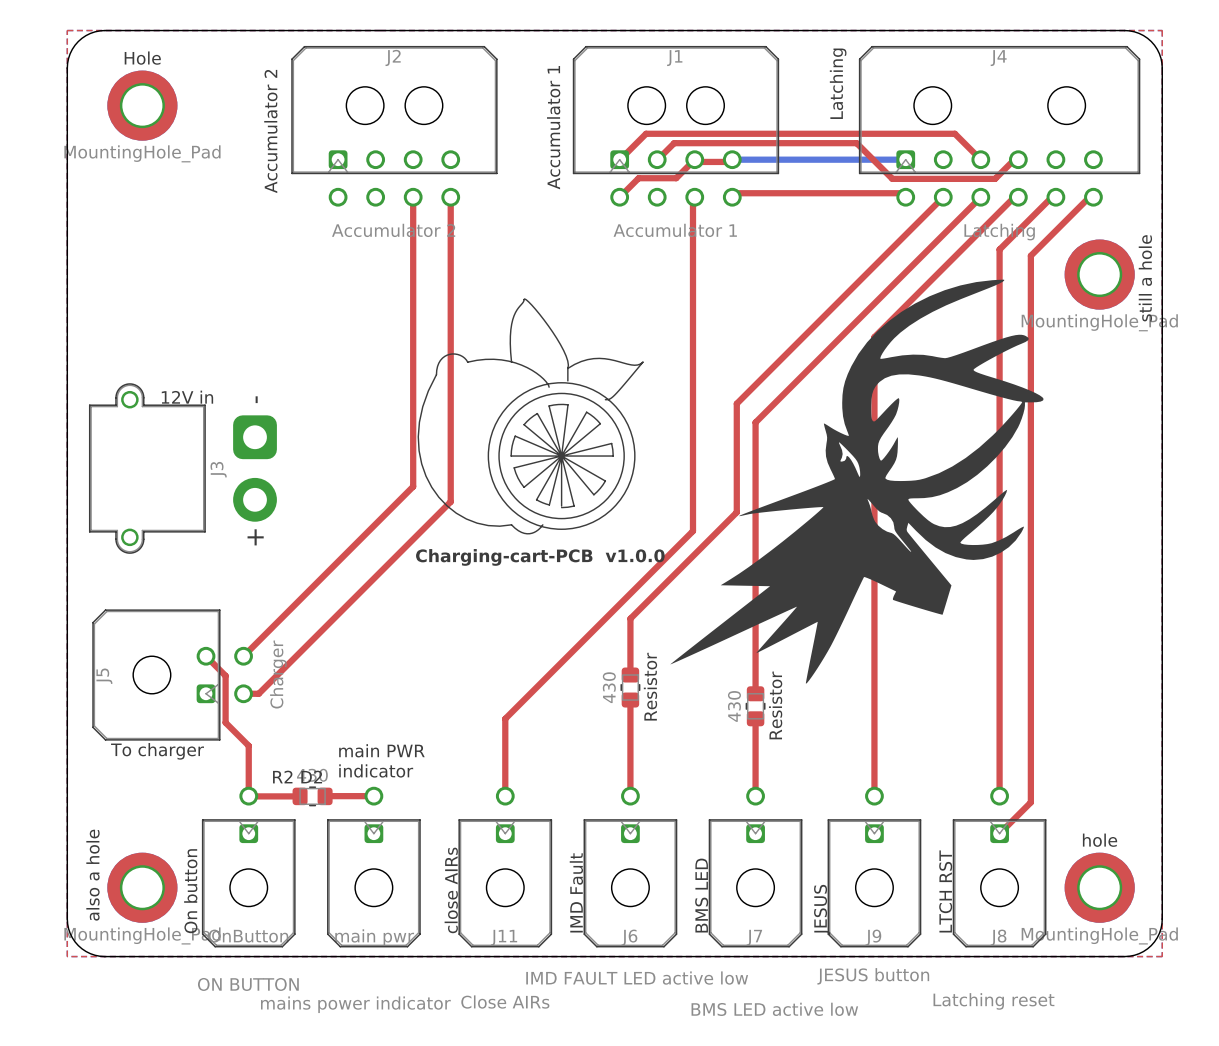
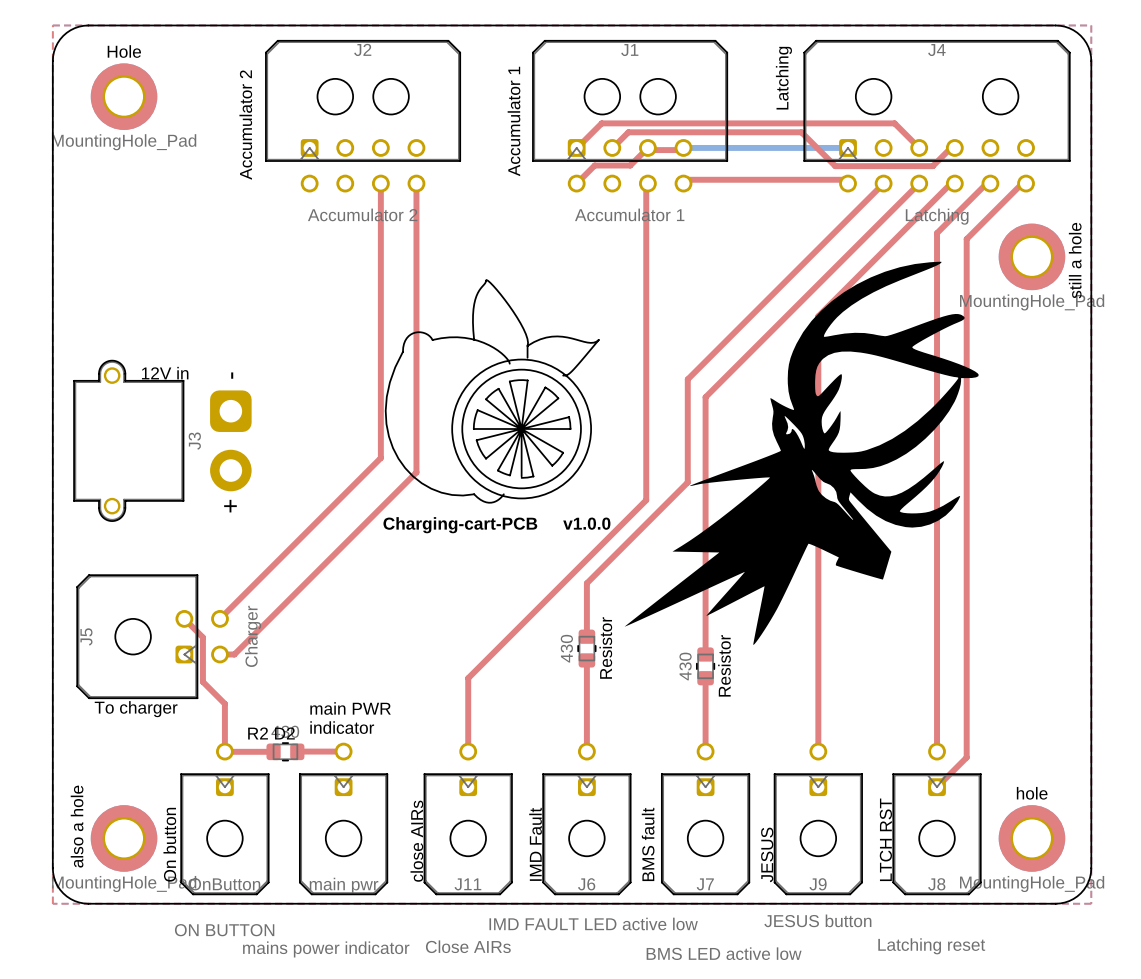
text: BMS LED (701, 895) -> BMS fault (648, 844)

